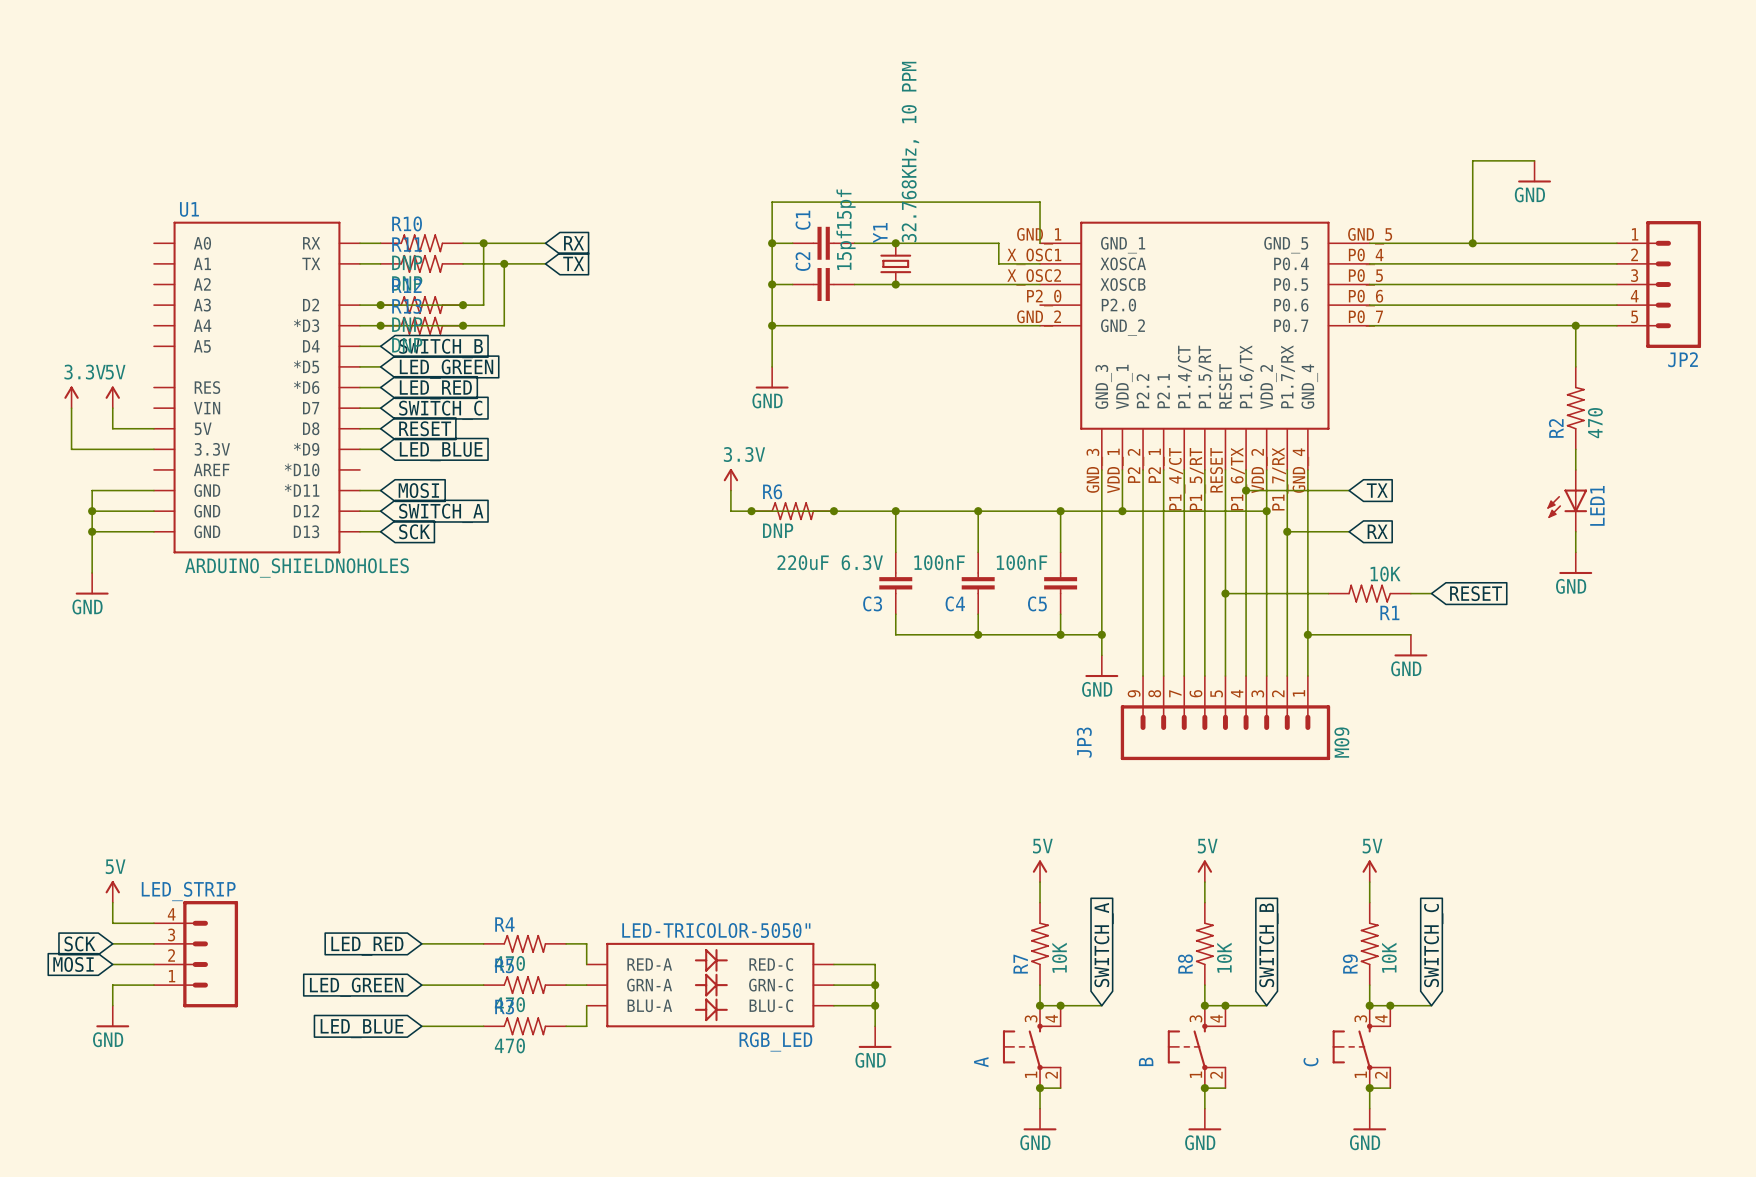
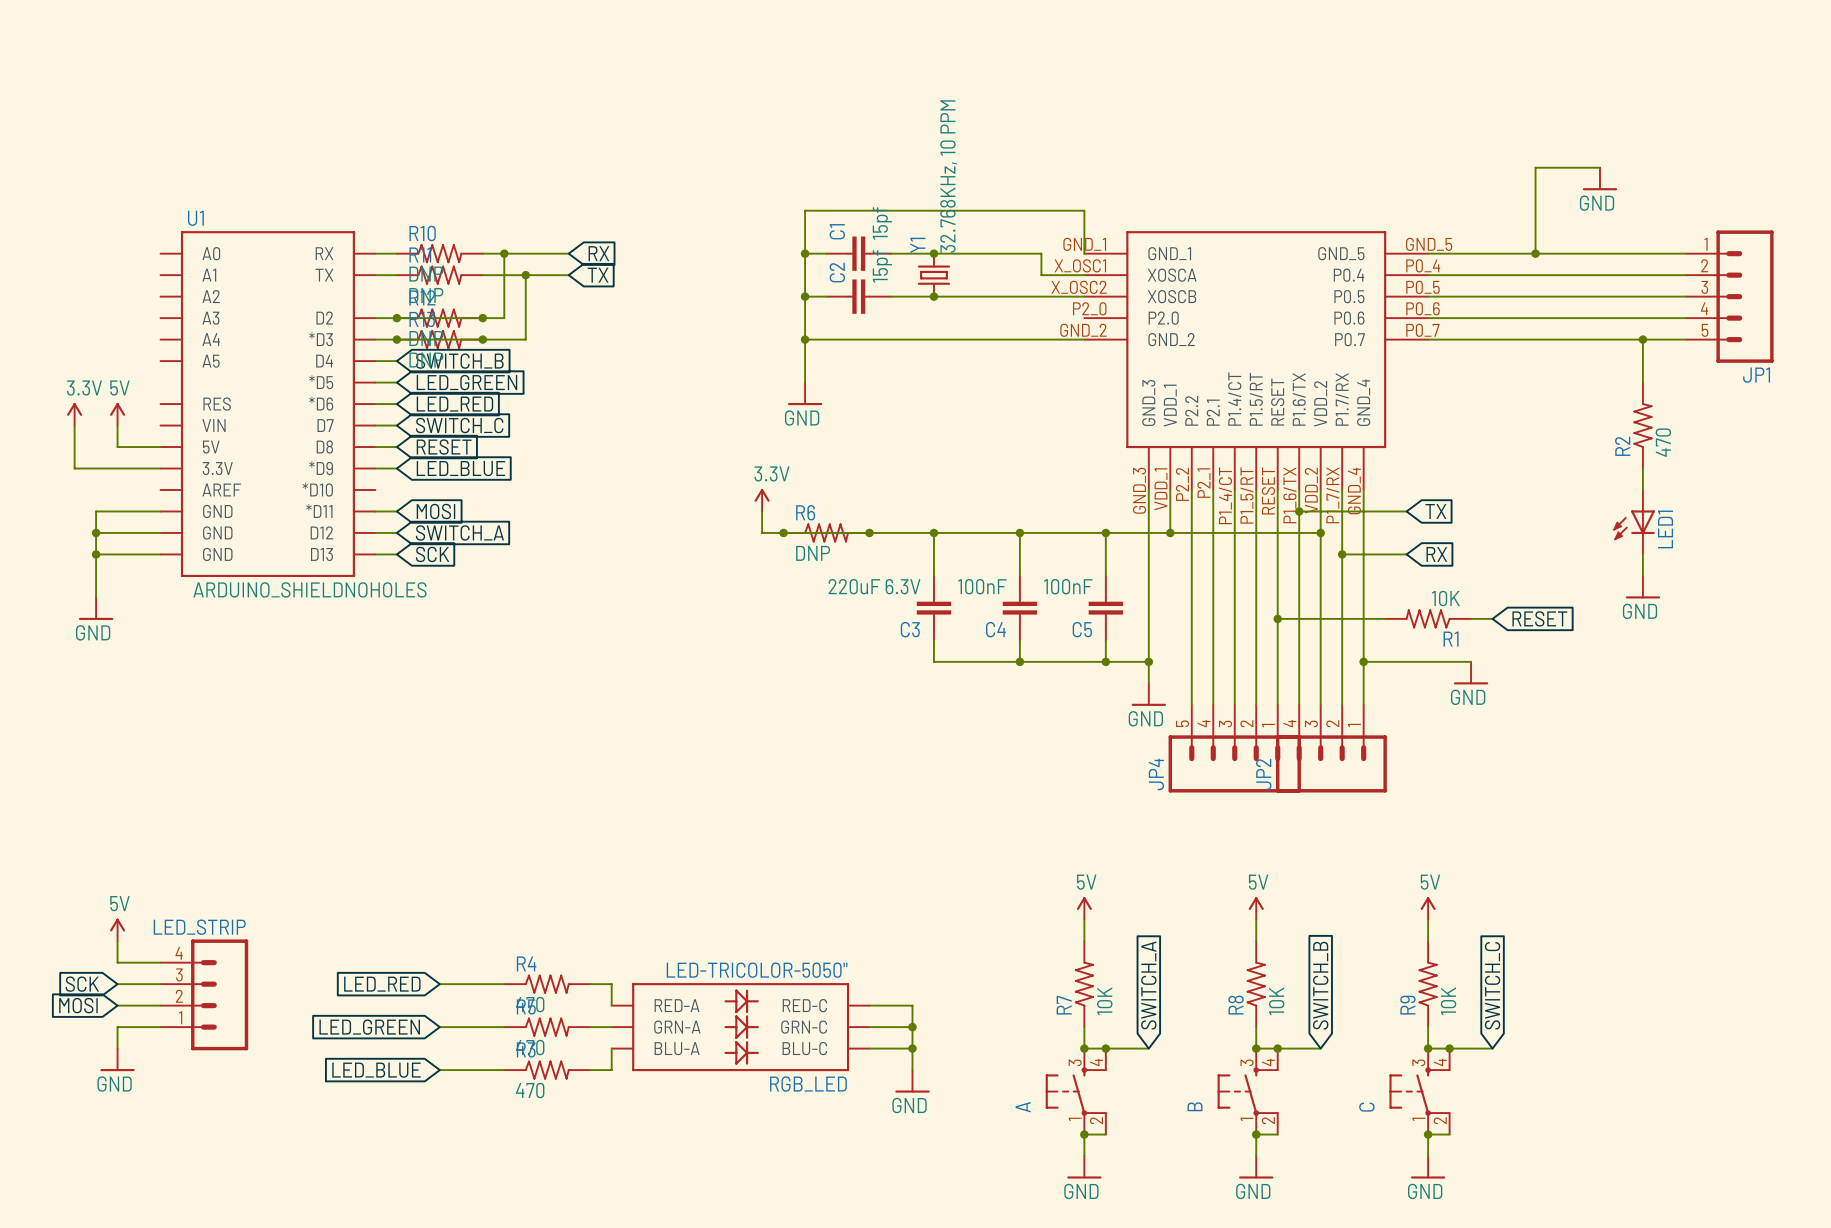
JP2 name: JP2 (1683, 359) -> JP1 (1756, 375)
JP4: none -> (1234, 748)
JP3: M09 (1225, 718) -> none
JP2: none -> (1331, 748)

